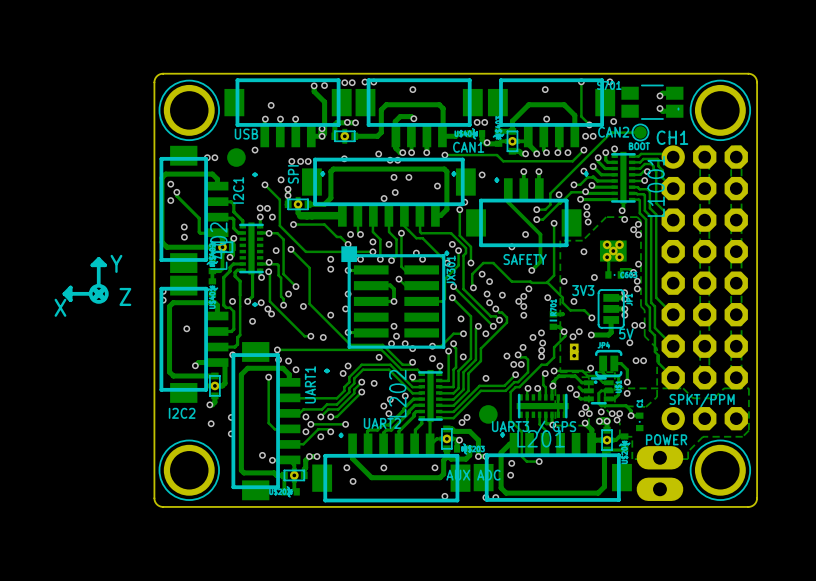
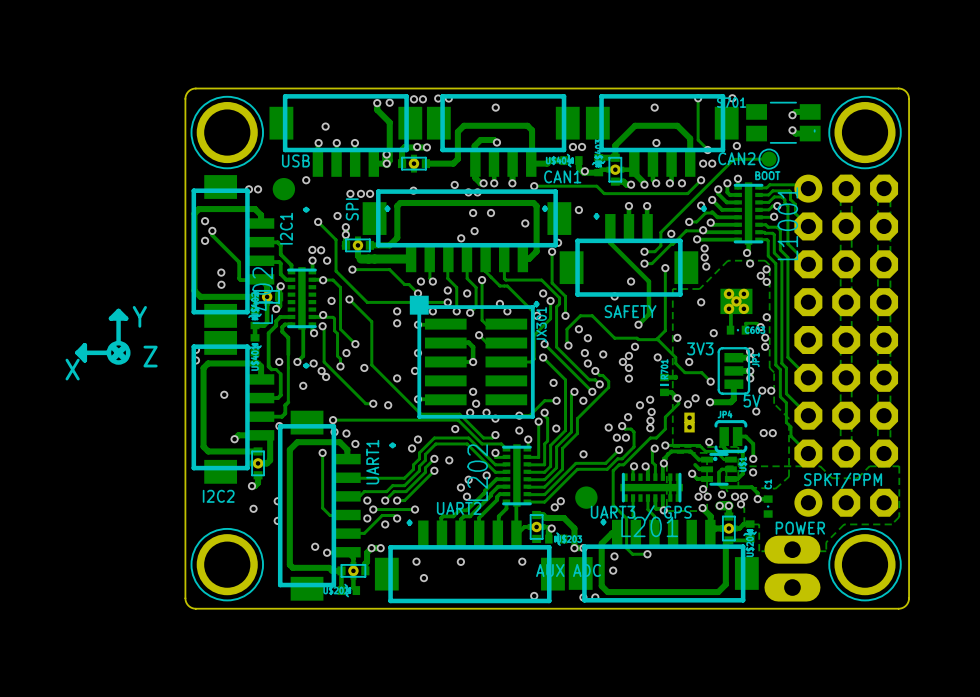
text: CH1 (672, 137) -> none
via: (570, 388) -> none
track: (352, 444) (352, 458) (371, 477) (439, 477) (443, 473) (443, 460) (446, 457) (446, 448) -> none
track: (469, 448) (469, 455) (466, 459) (451, 459) (446, 454) -> none

